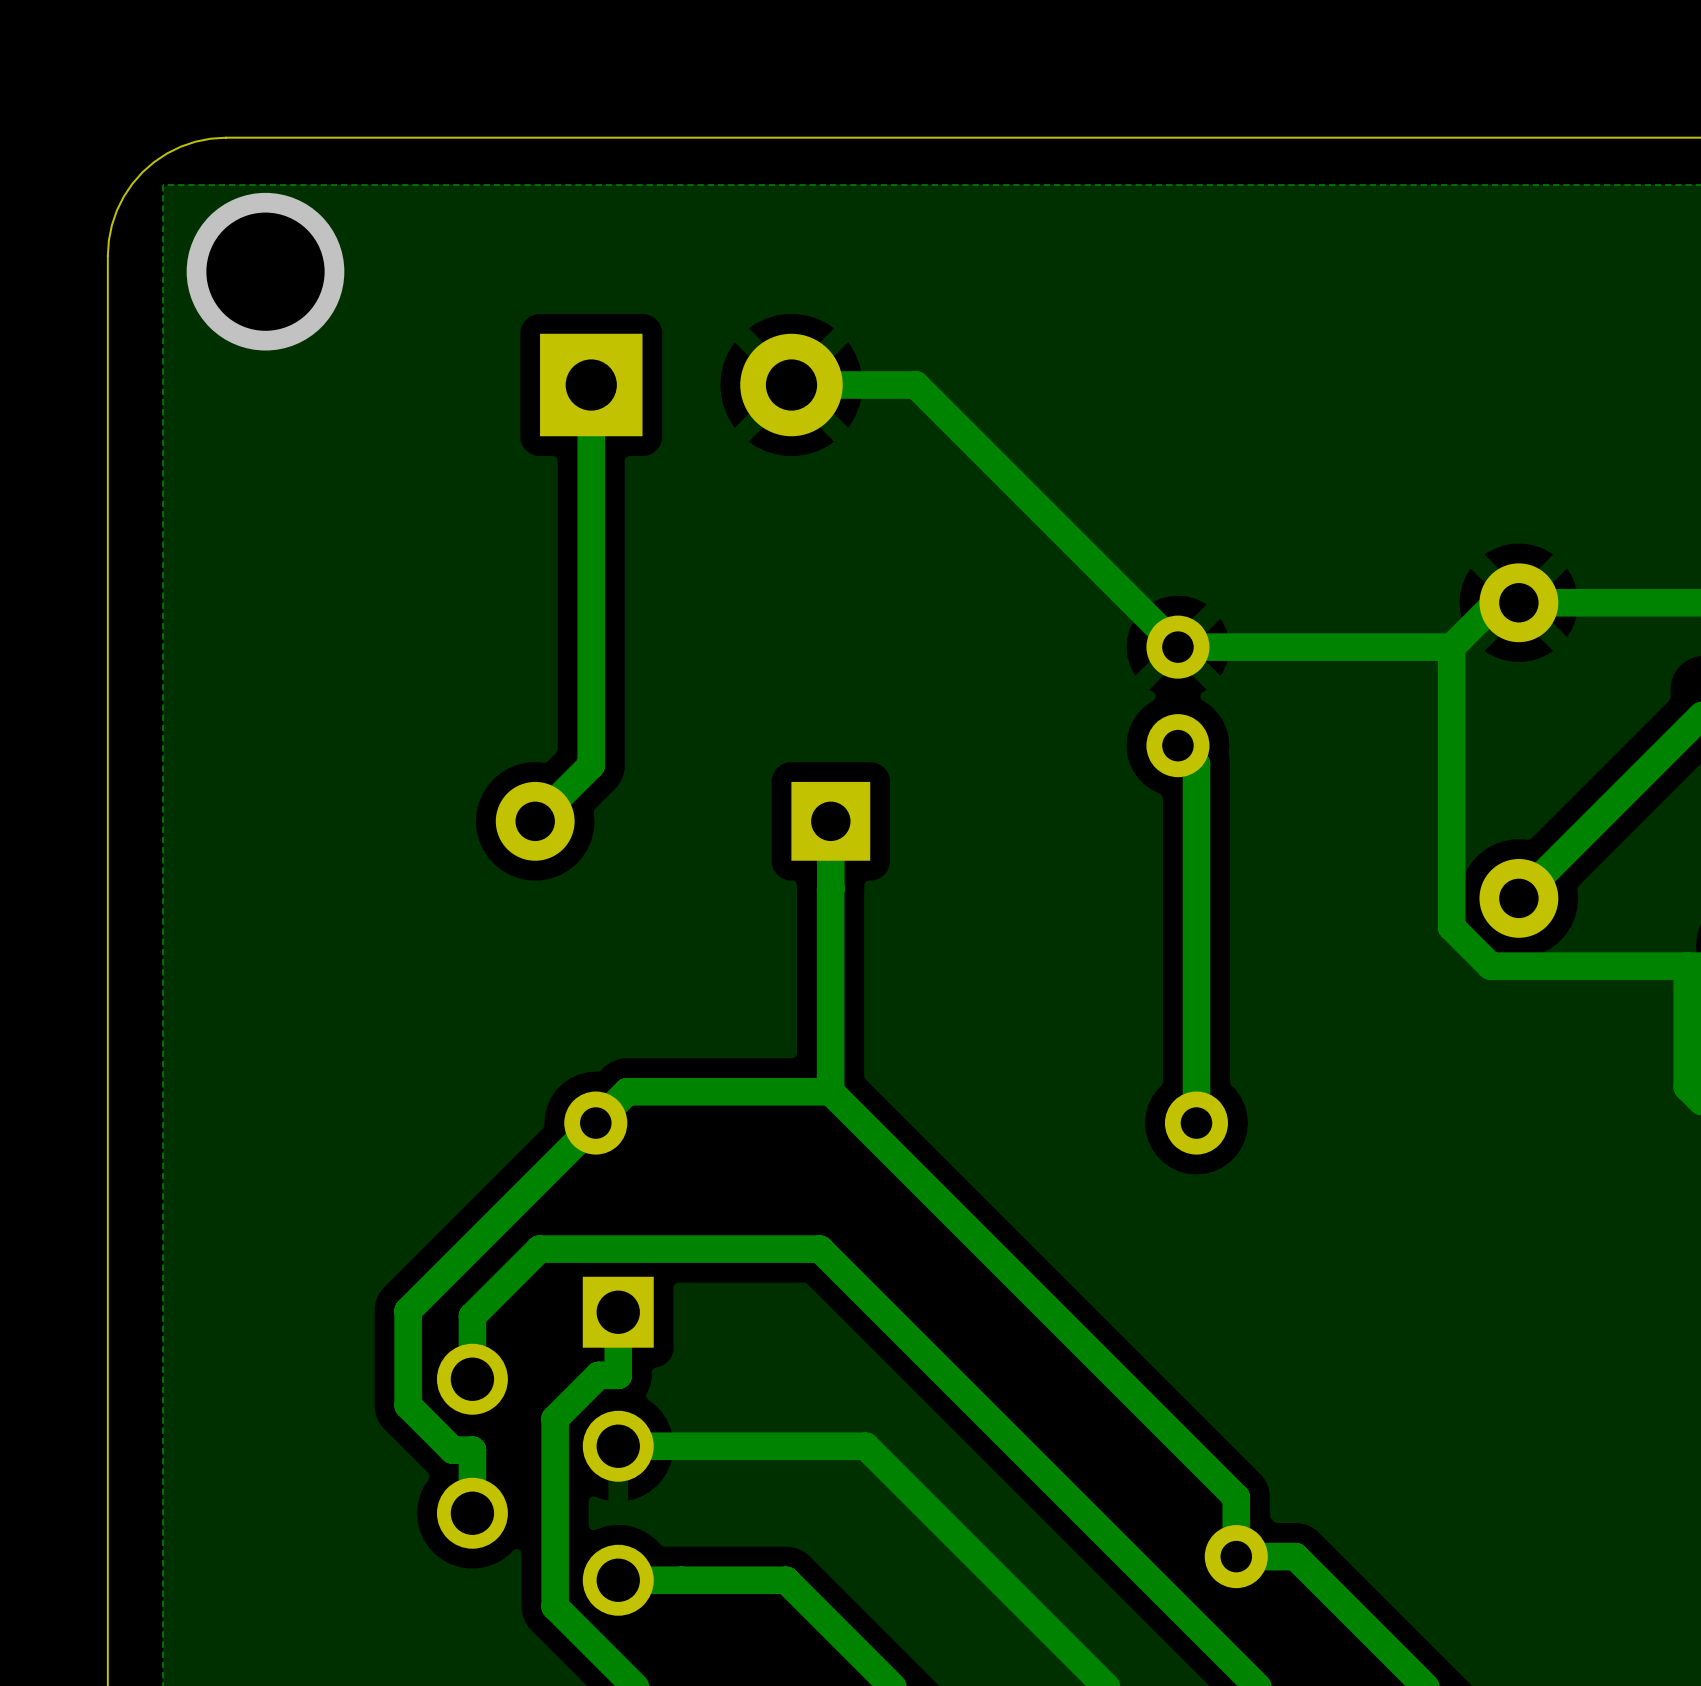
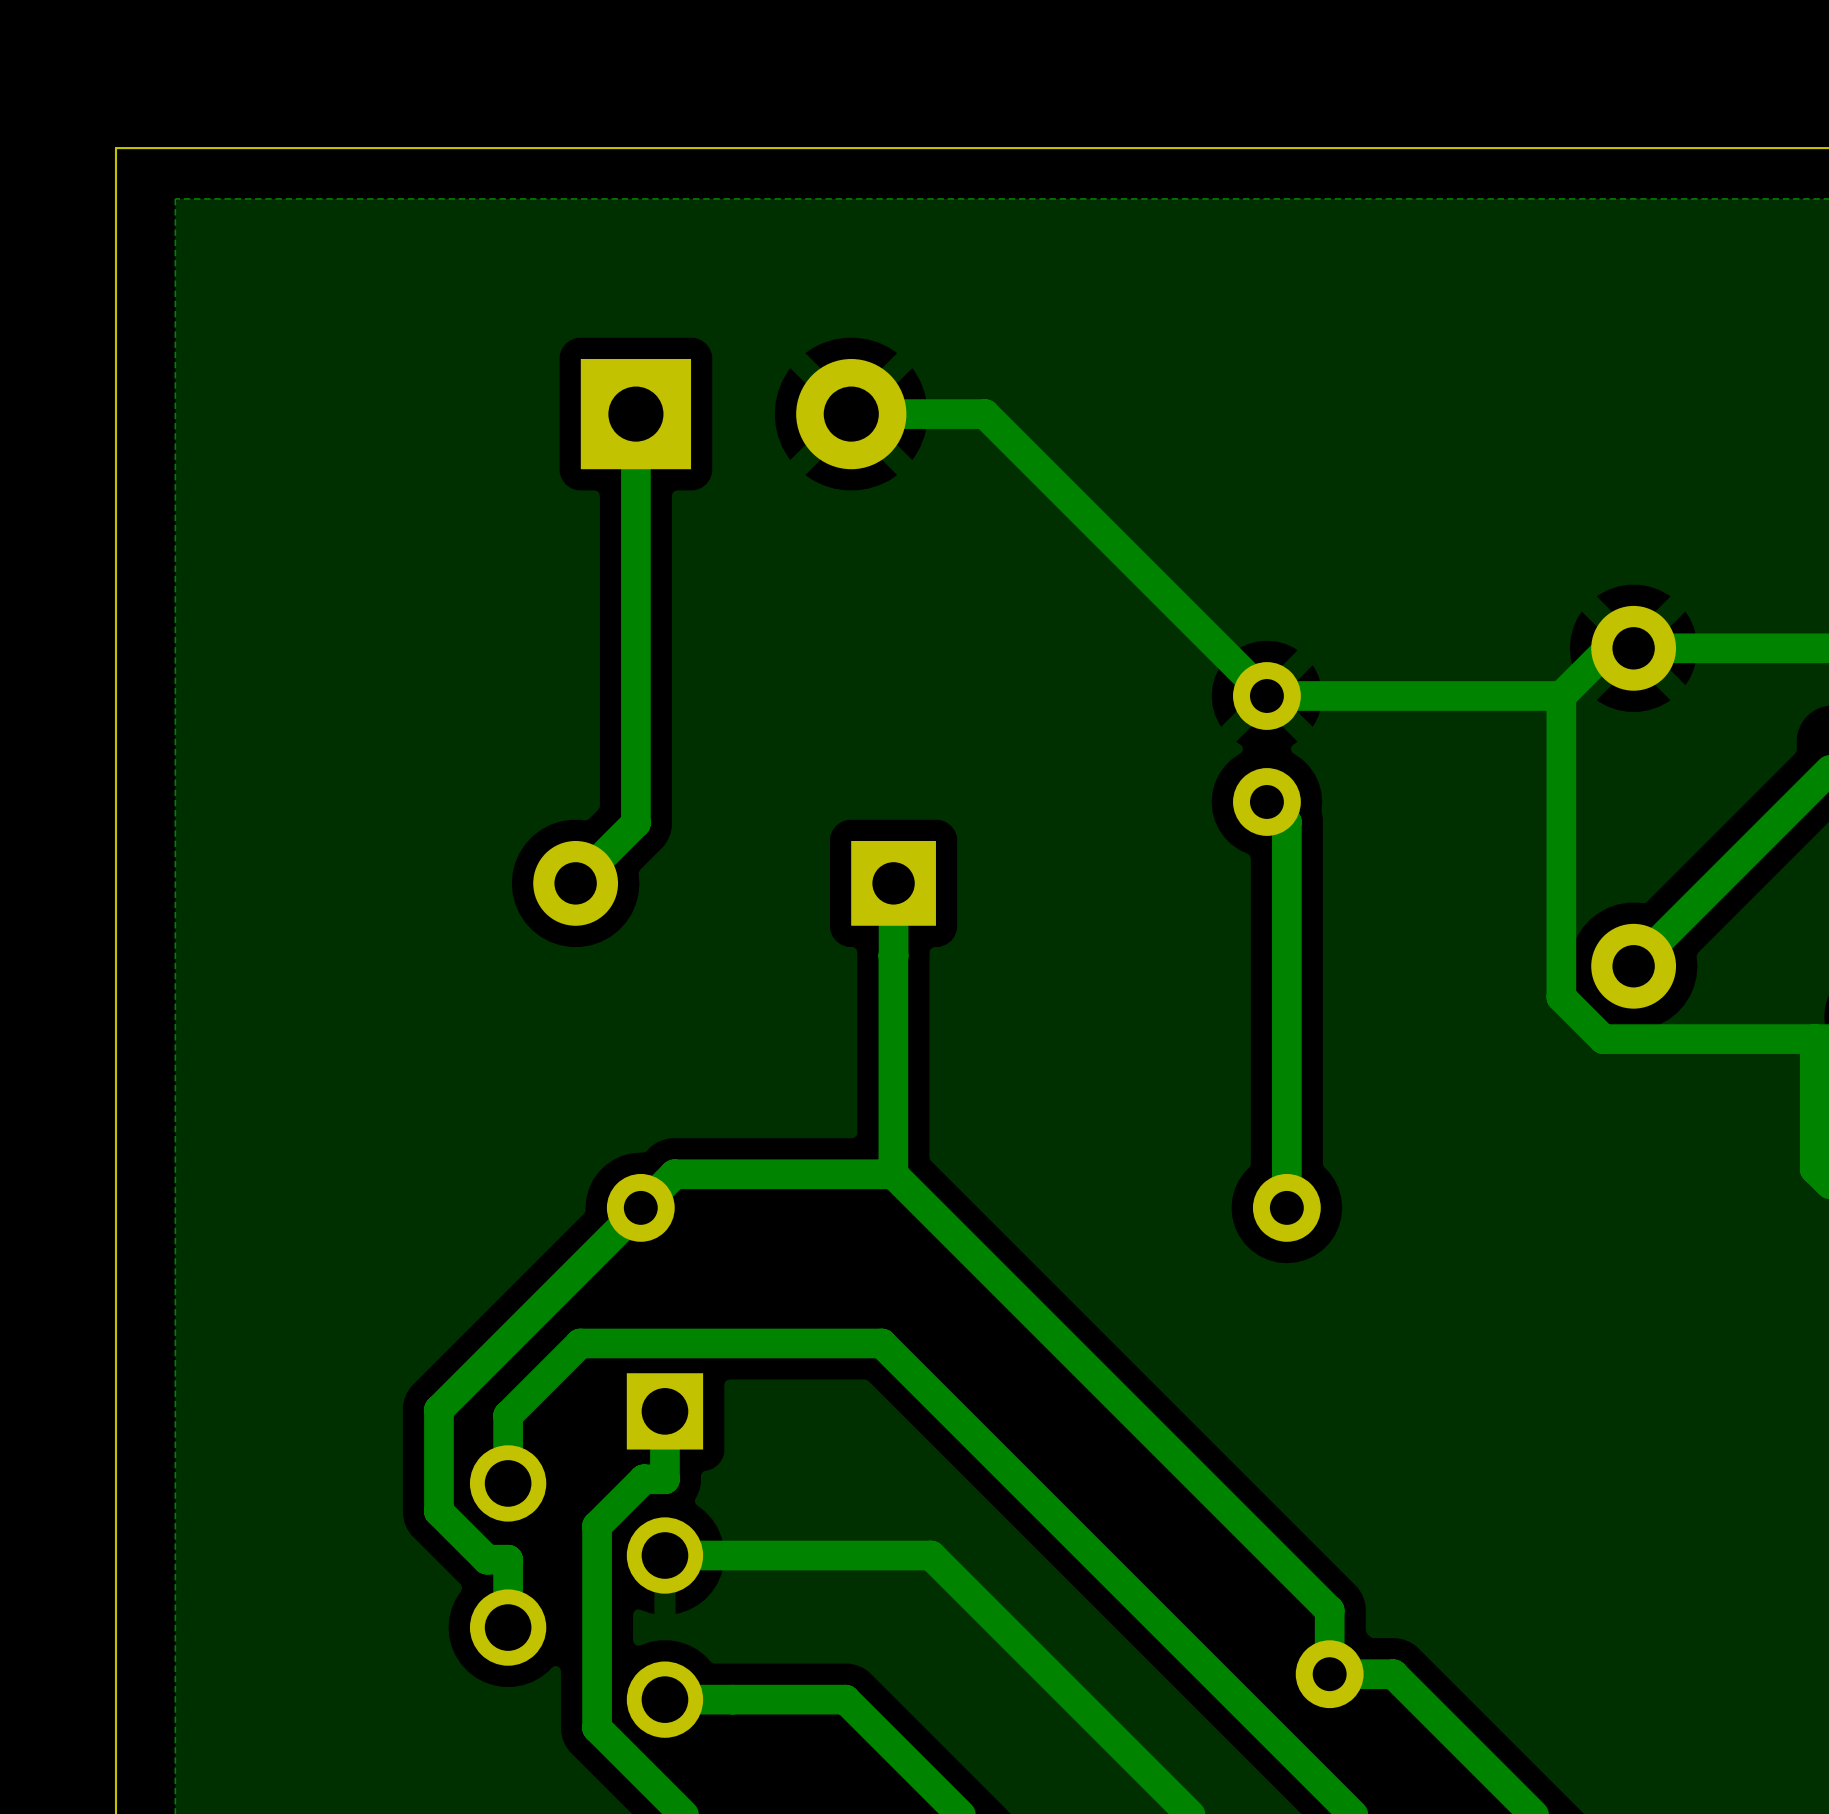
board edge: (226, 137) (210, 138) (180, 146) (154, 162) (142, 172) (132, 183) (116, 210) (111, 225) (107, 255) -> (243, 148) (115, 148) (115, 275)
via: (265, 271) -> none

